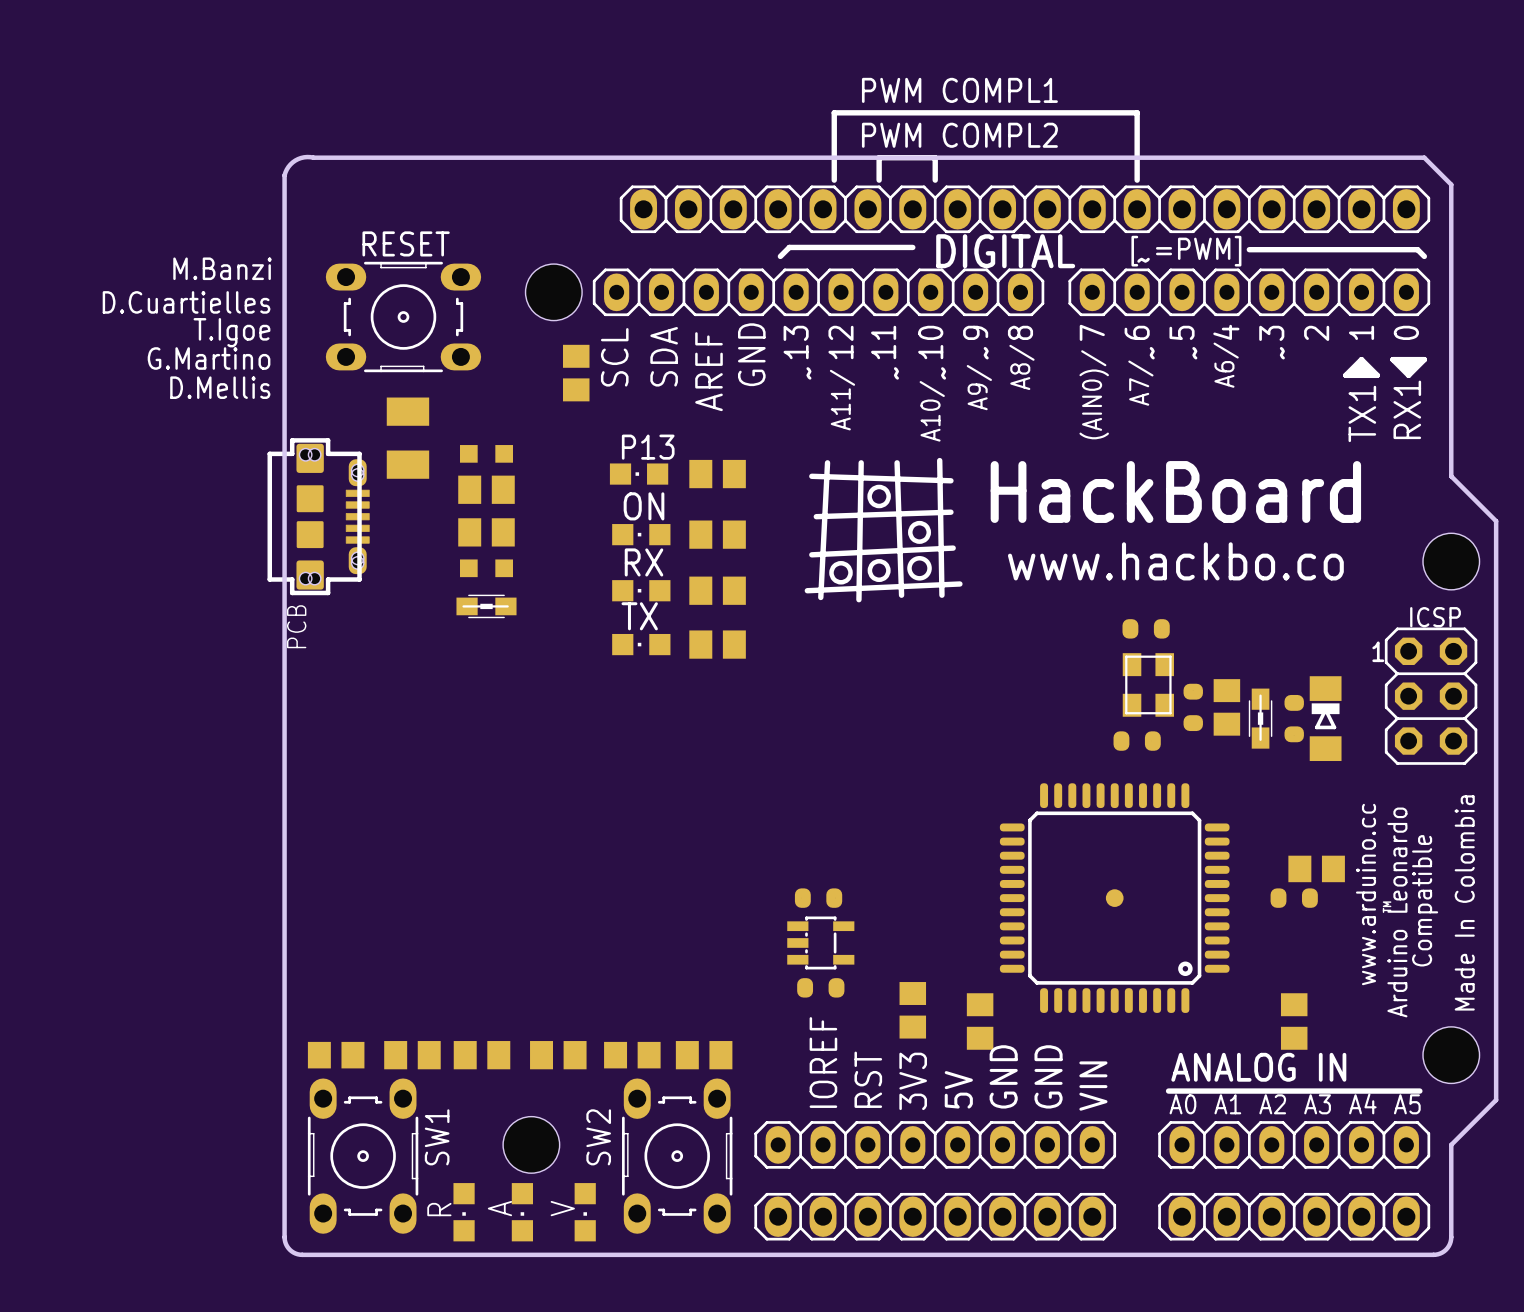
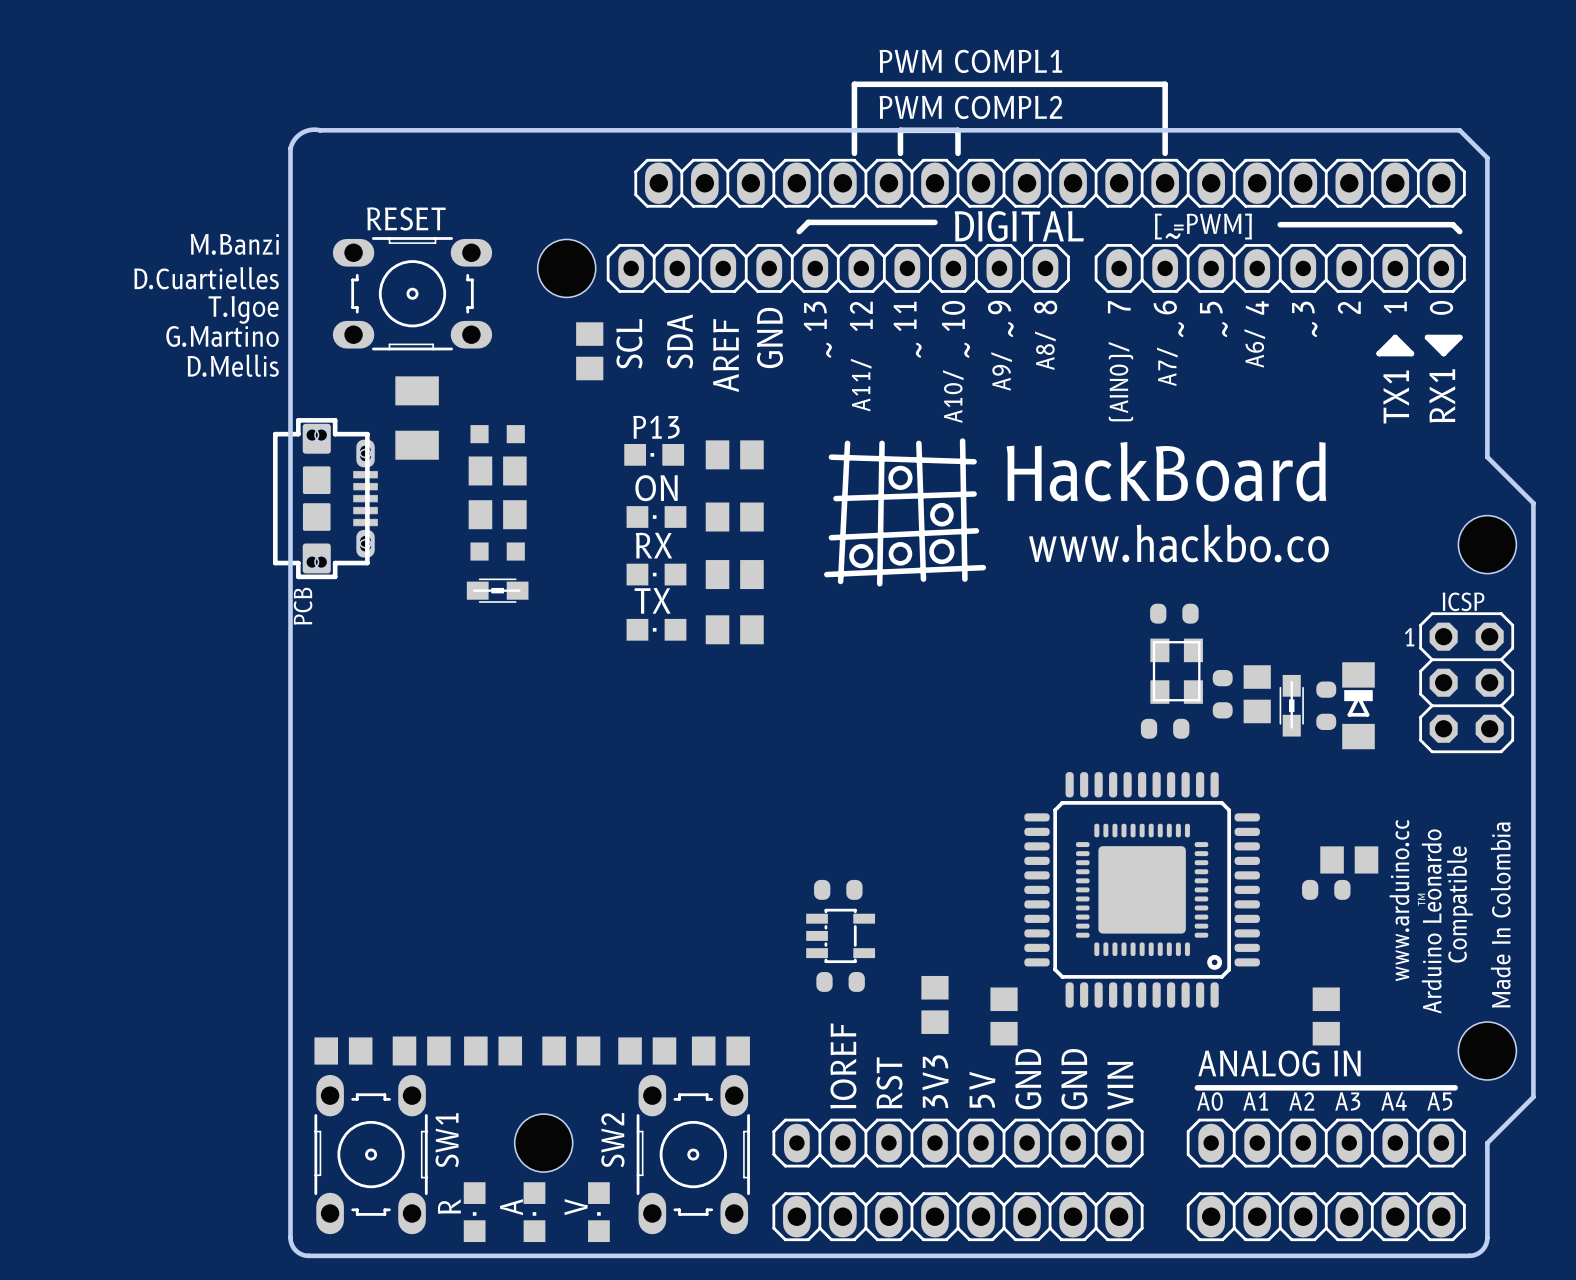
part: none -> (1142, 889)

